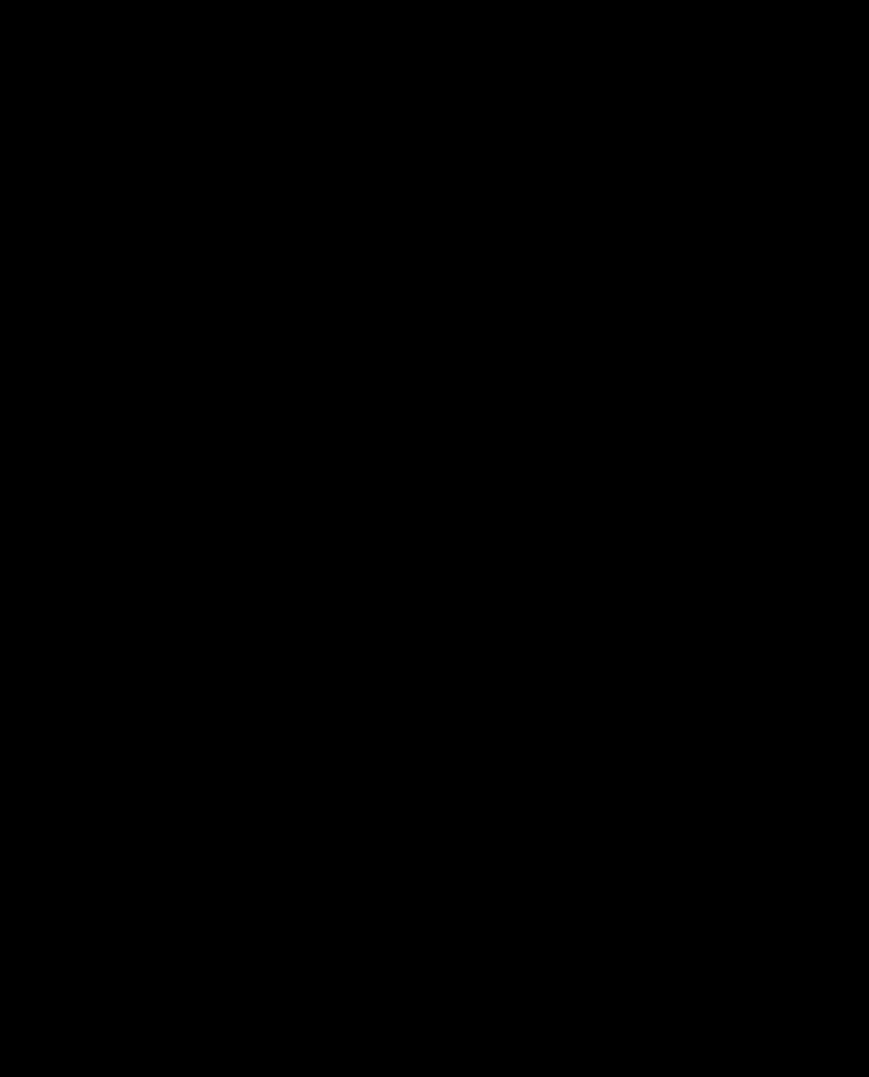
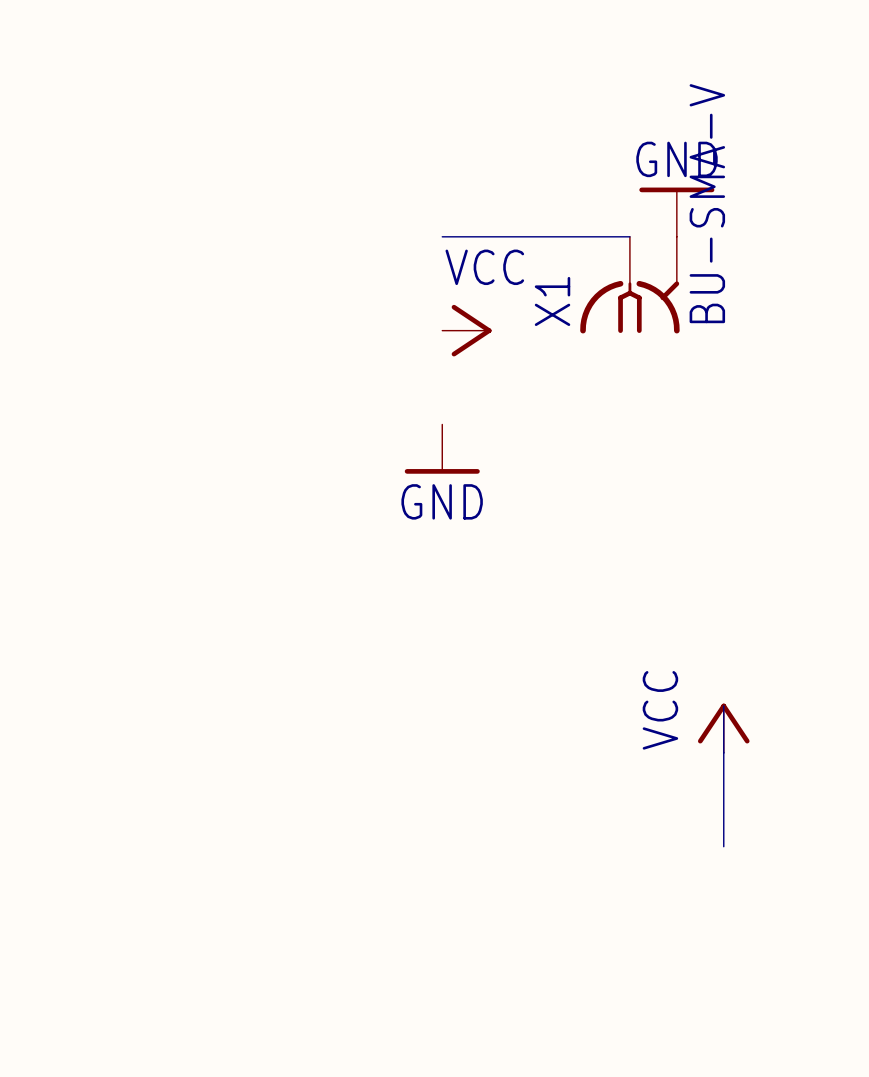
power symbol: none -> GND (676, 212)
wire: none -> (442, 236) (629, 236)
X1: none -> BU-SMA-V (629, 285)
power symbol: none -> VCC (466, 330)
power symbol: none -> GND (442, 449)
wire: none -> (723, 705) (723, 846)
power symbol: none -> VCC (723, 728)

